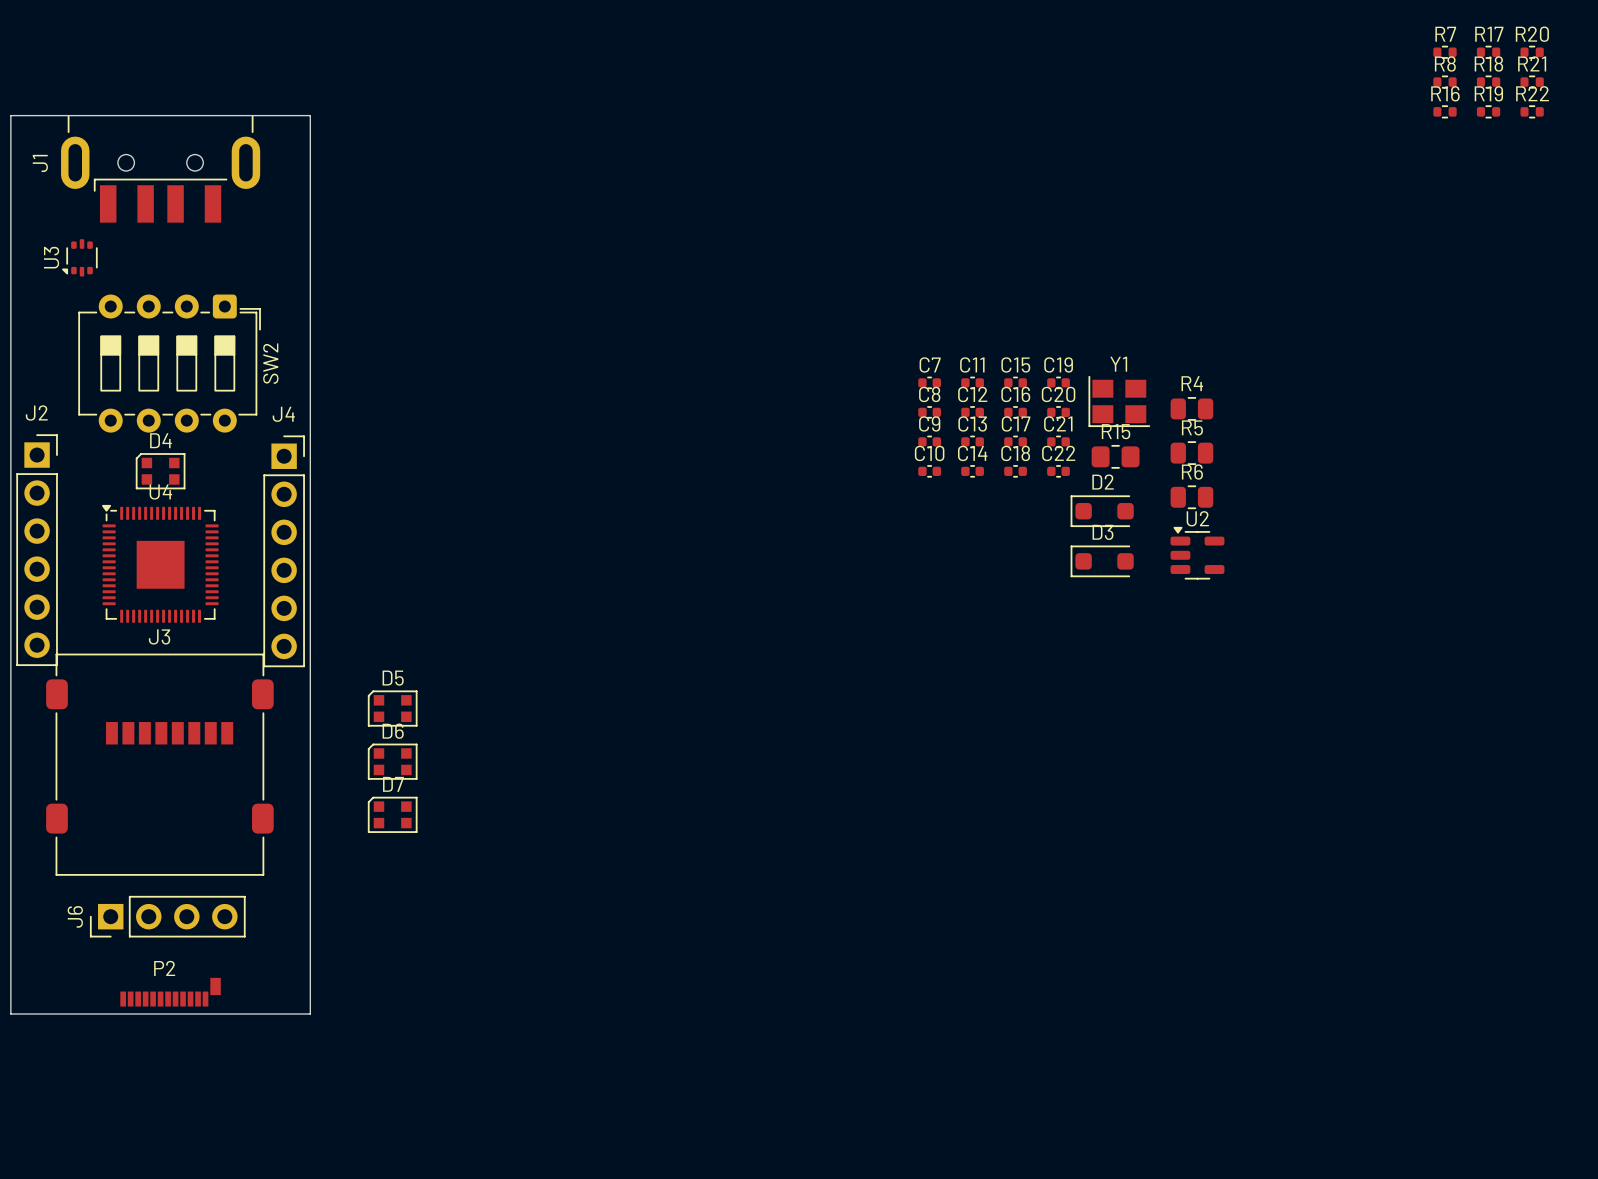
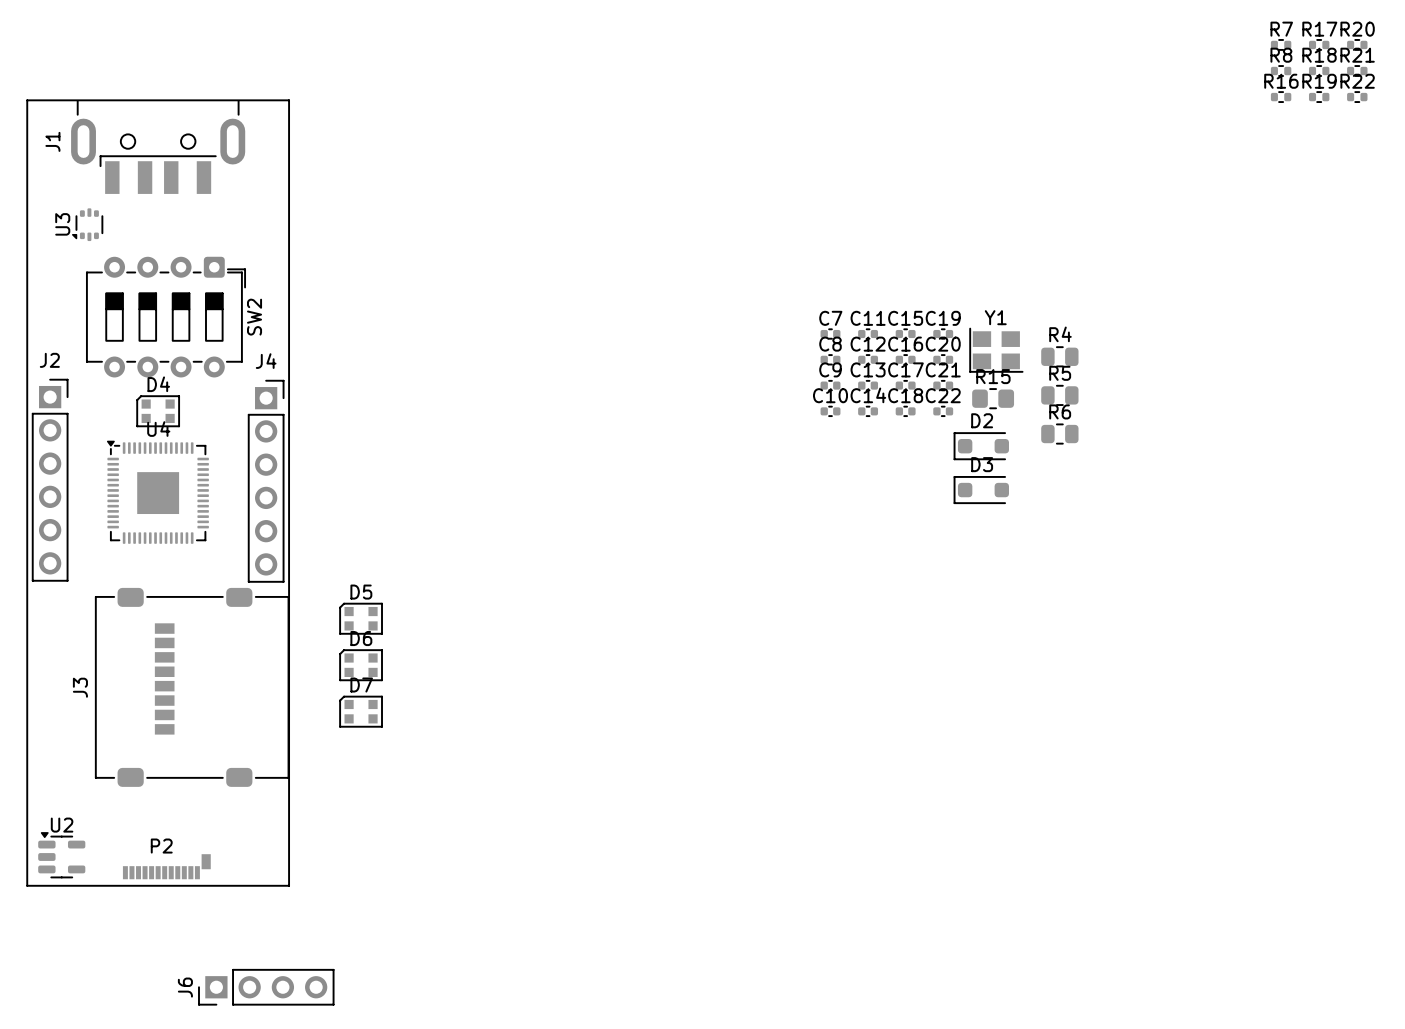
U2 position: (1197, 553) -> (61, 855)
J3 rotation: 0° (159, 764) -> 90° counterclockwise (192, 687)
J6 position: (167, 916) -> (266, 987)

